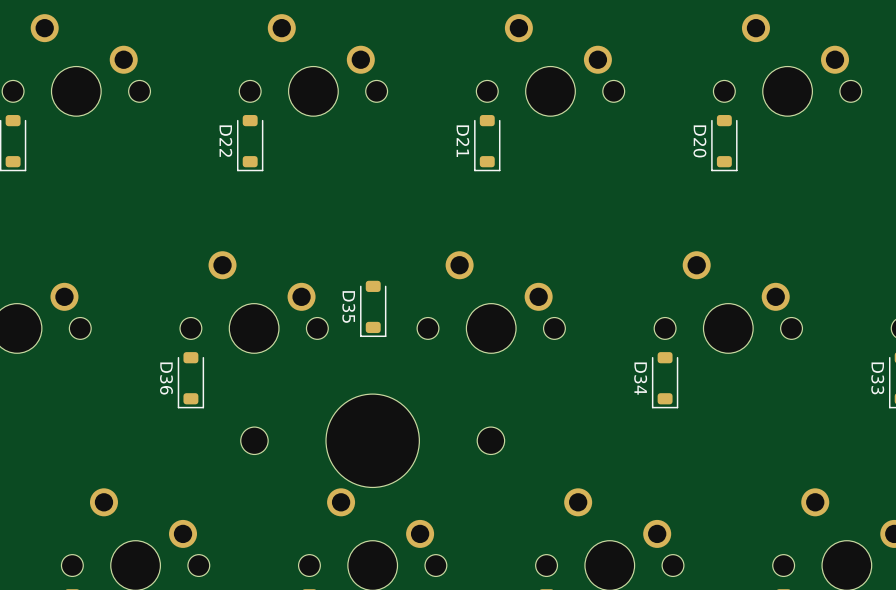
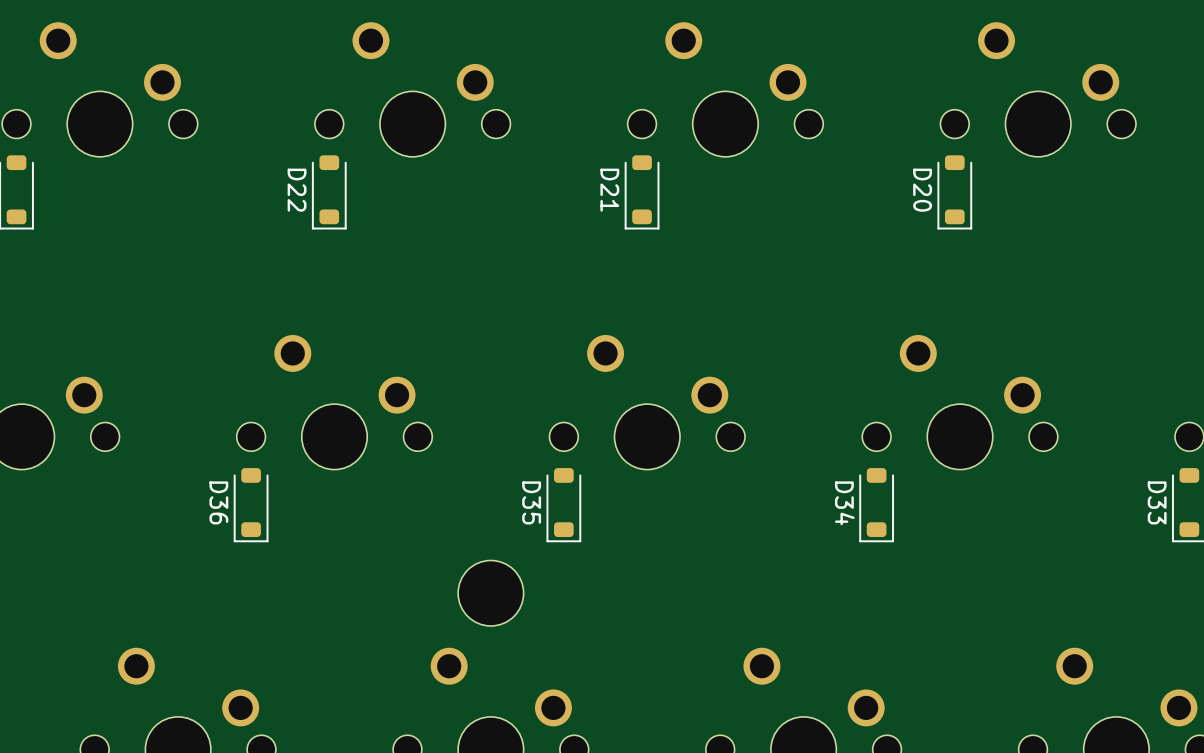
D35 position: (373, 308) -> (563, 505)
part footprint: [326, 394, 420, 488] -> [458, 560, 524, 626]
part: (254, 440) -> none
part: (490, 440) -> none

